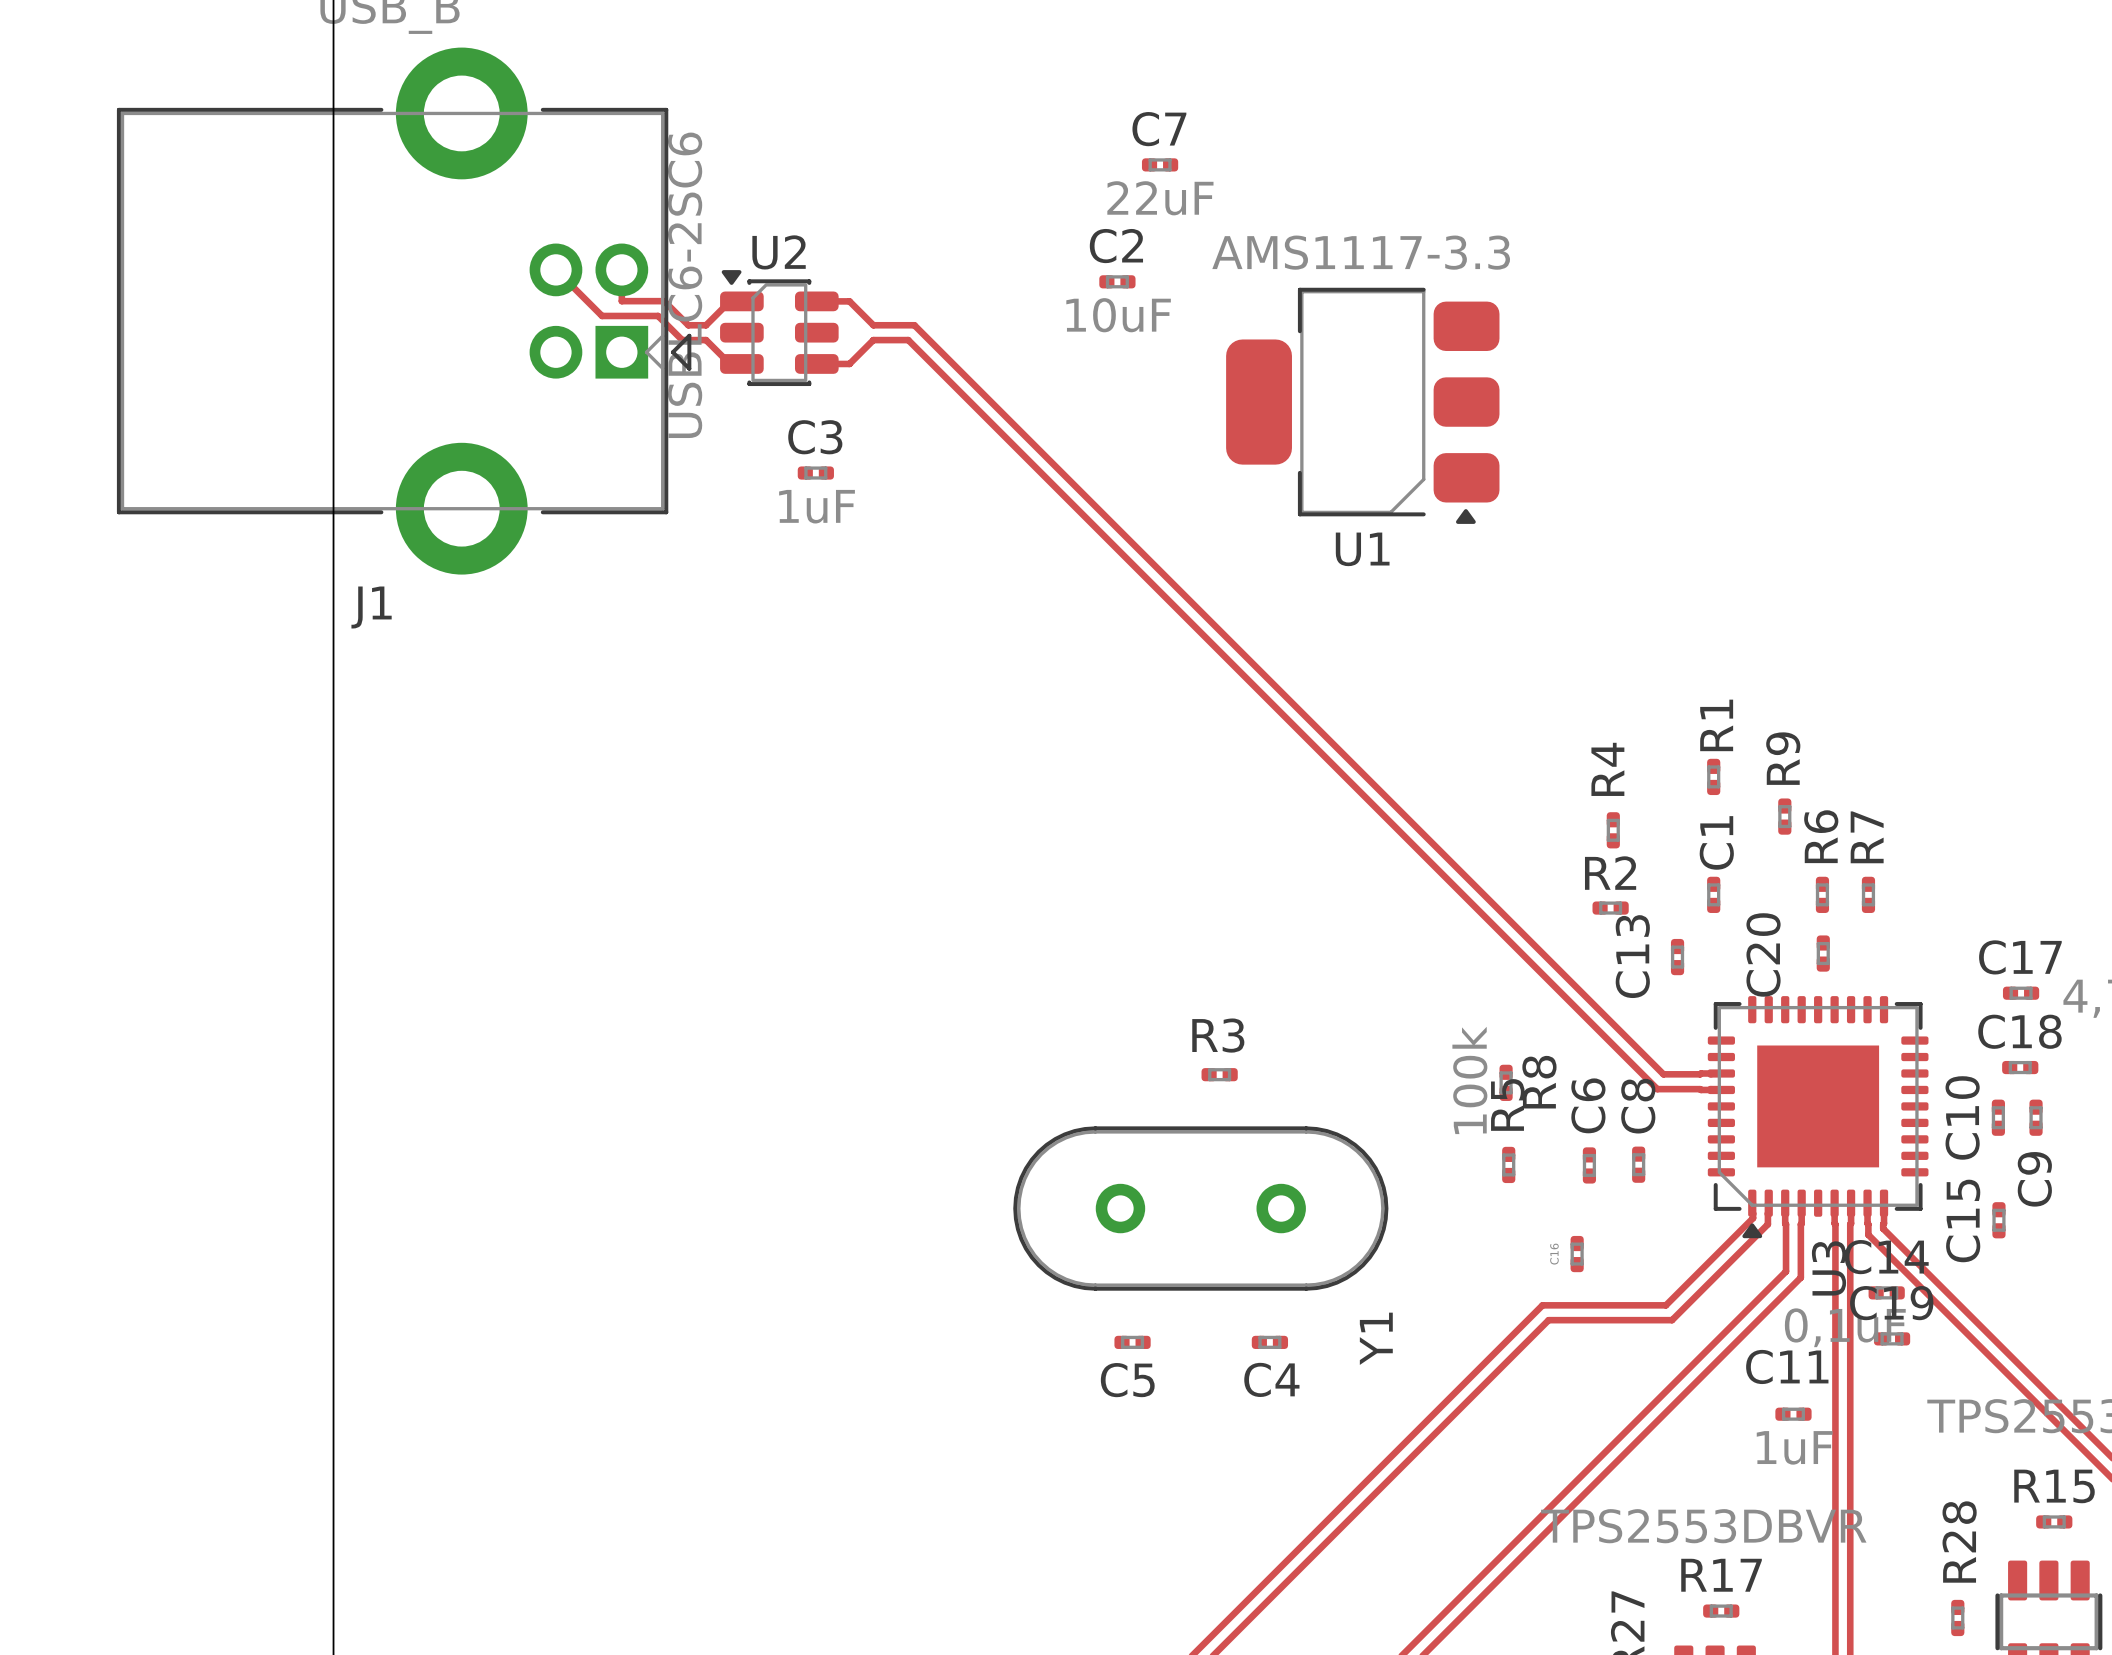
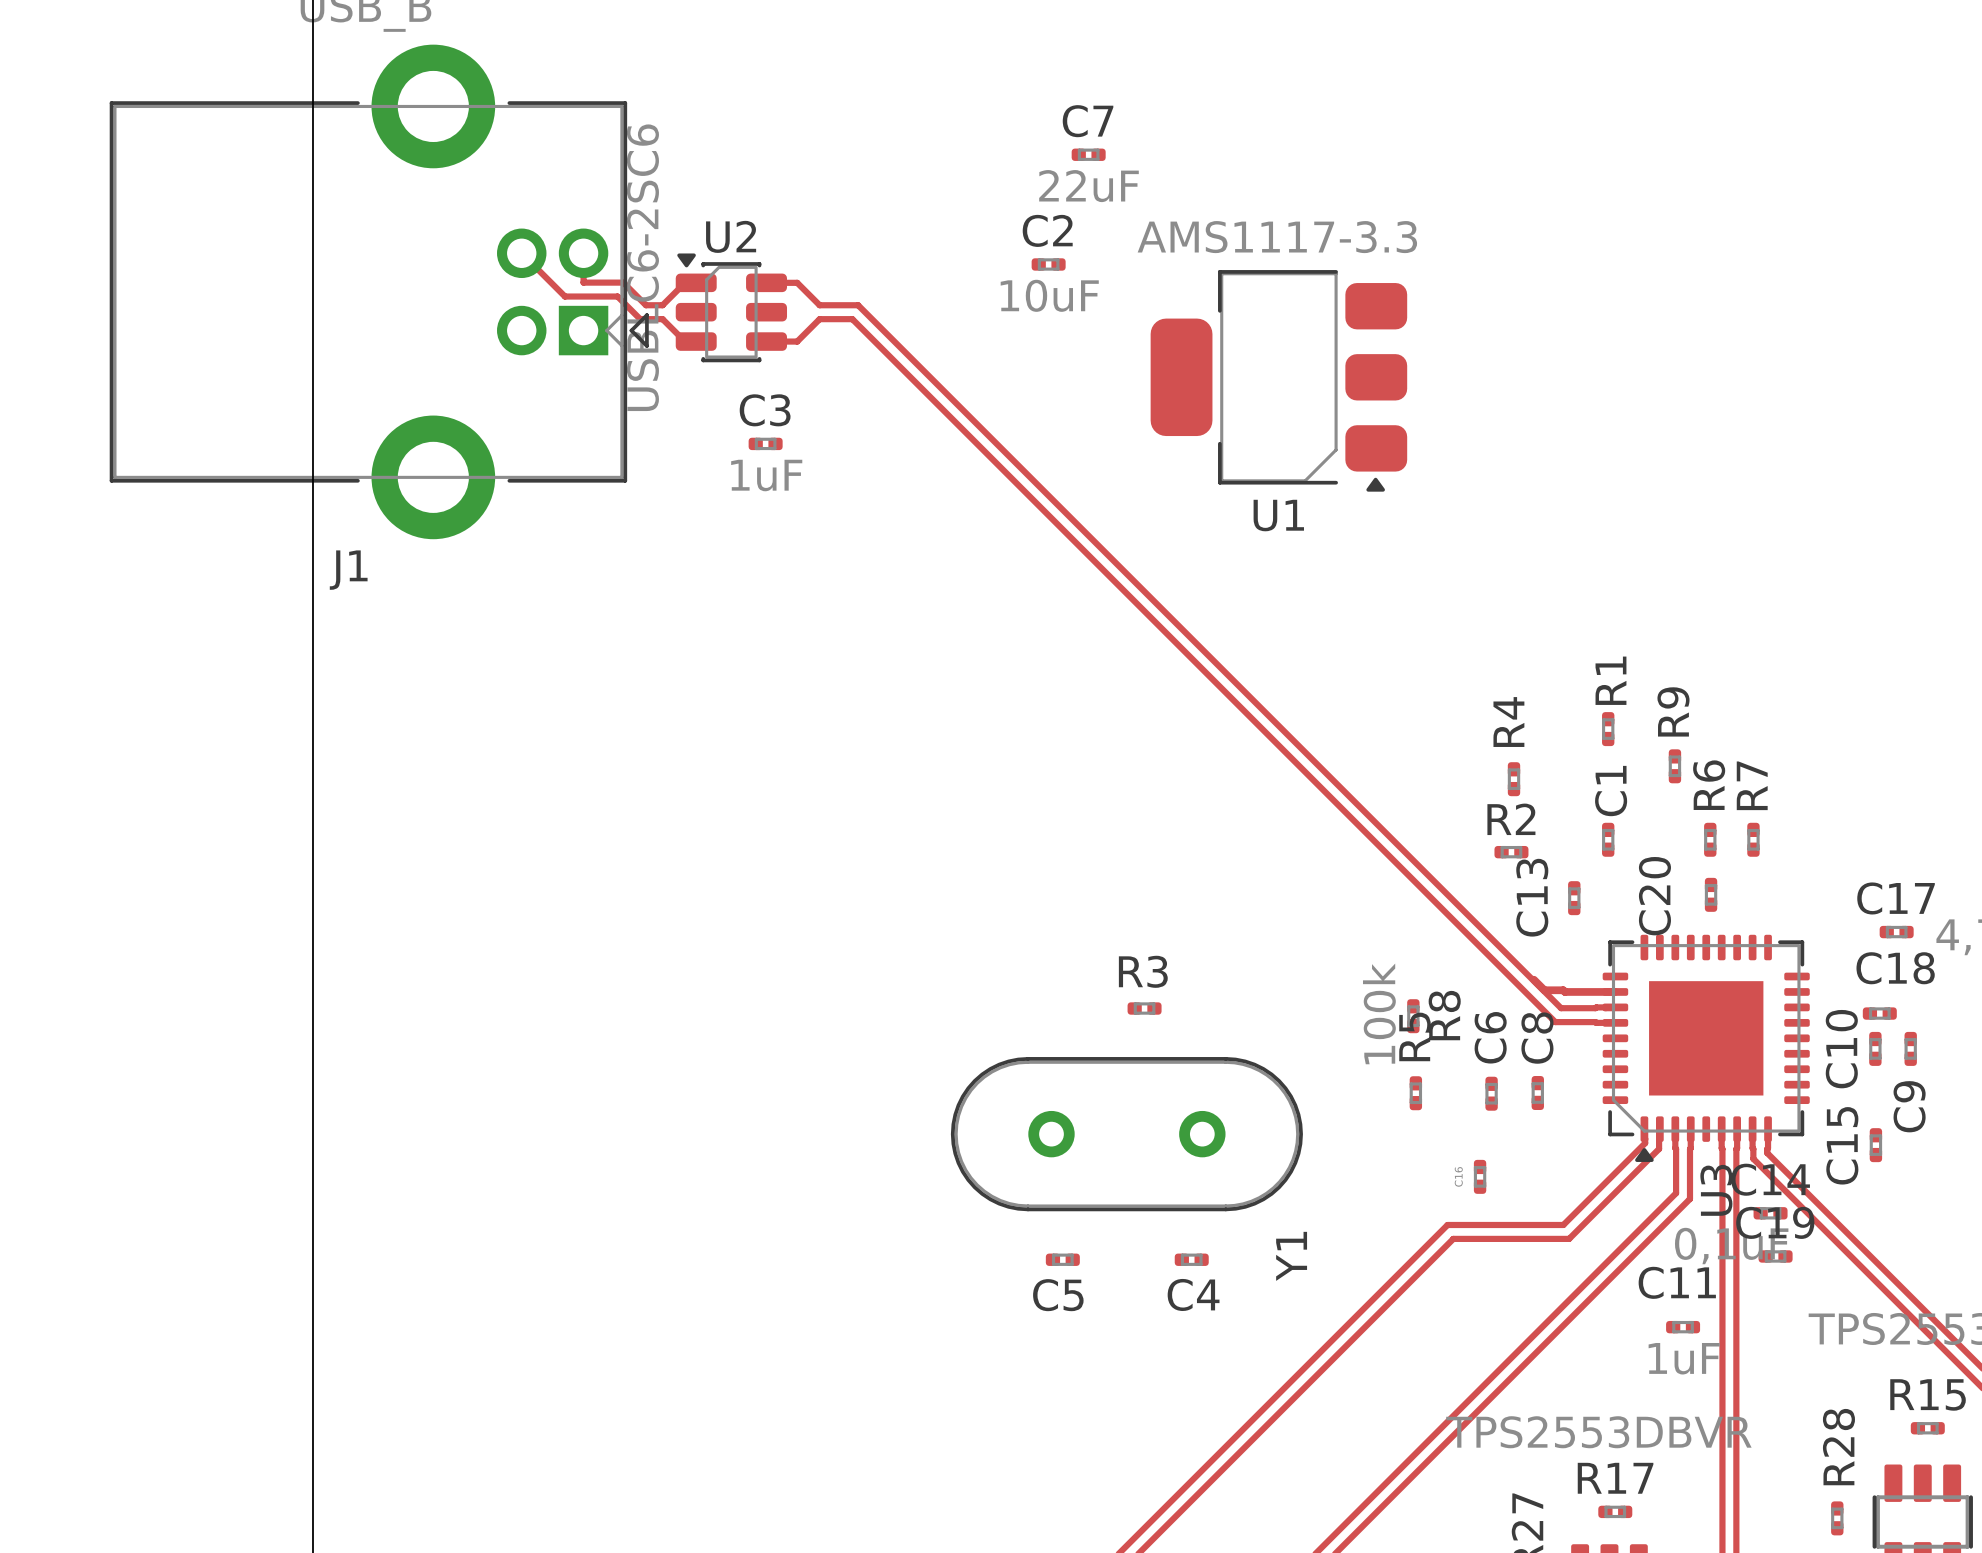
track: none -> (1533, 979) (1544, 990) (1615, 991)
C18 position: (2020, 1067) -> (1879, 1013)

